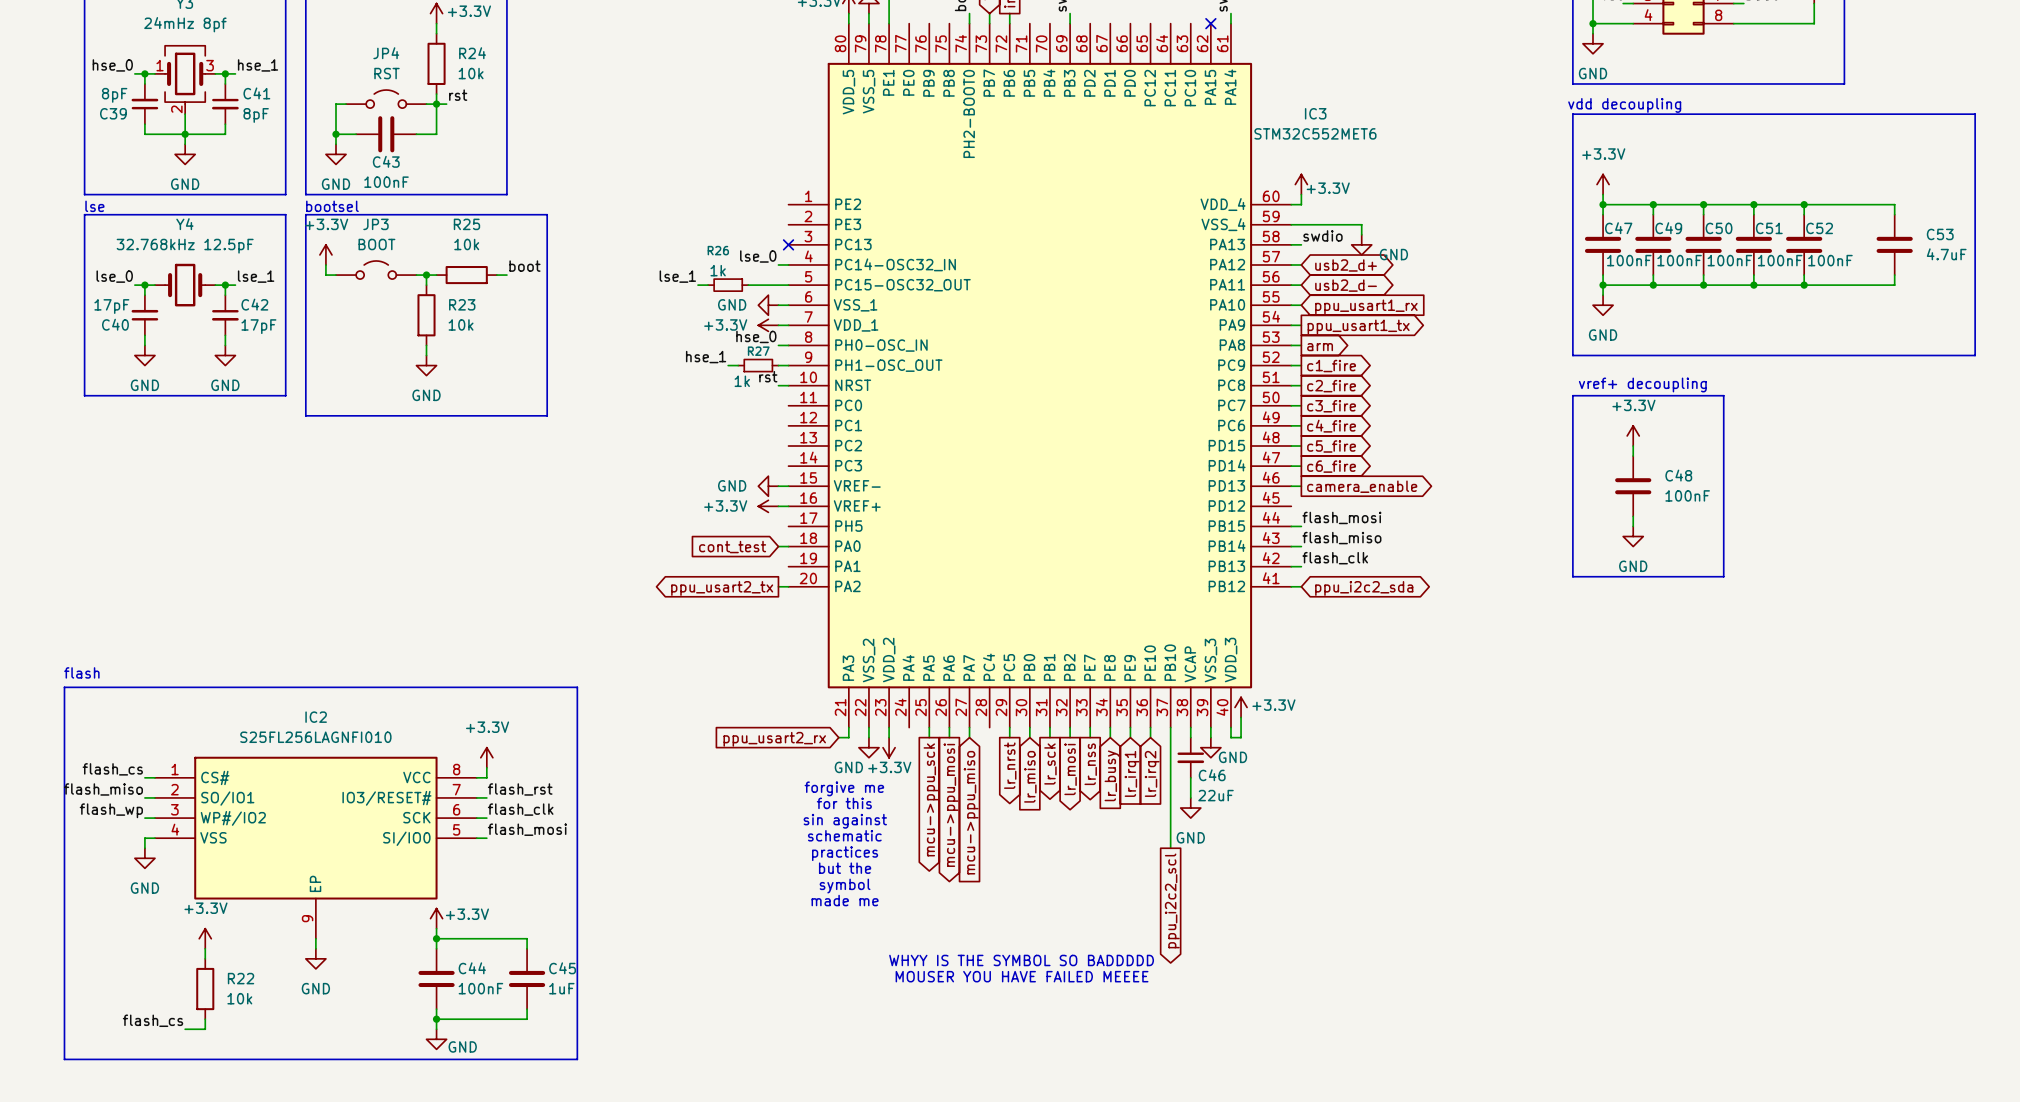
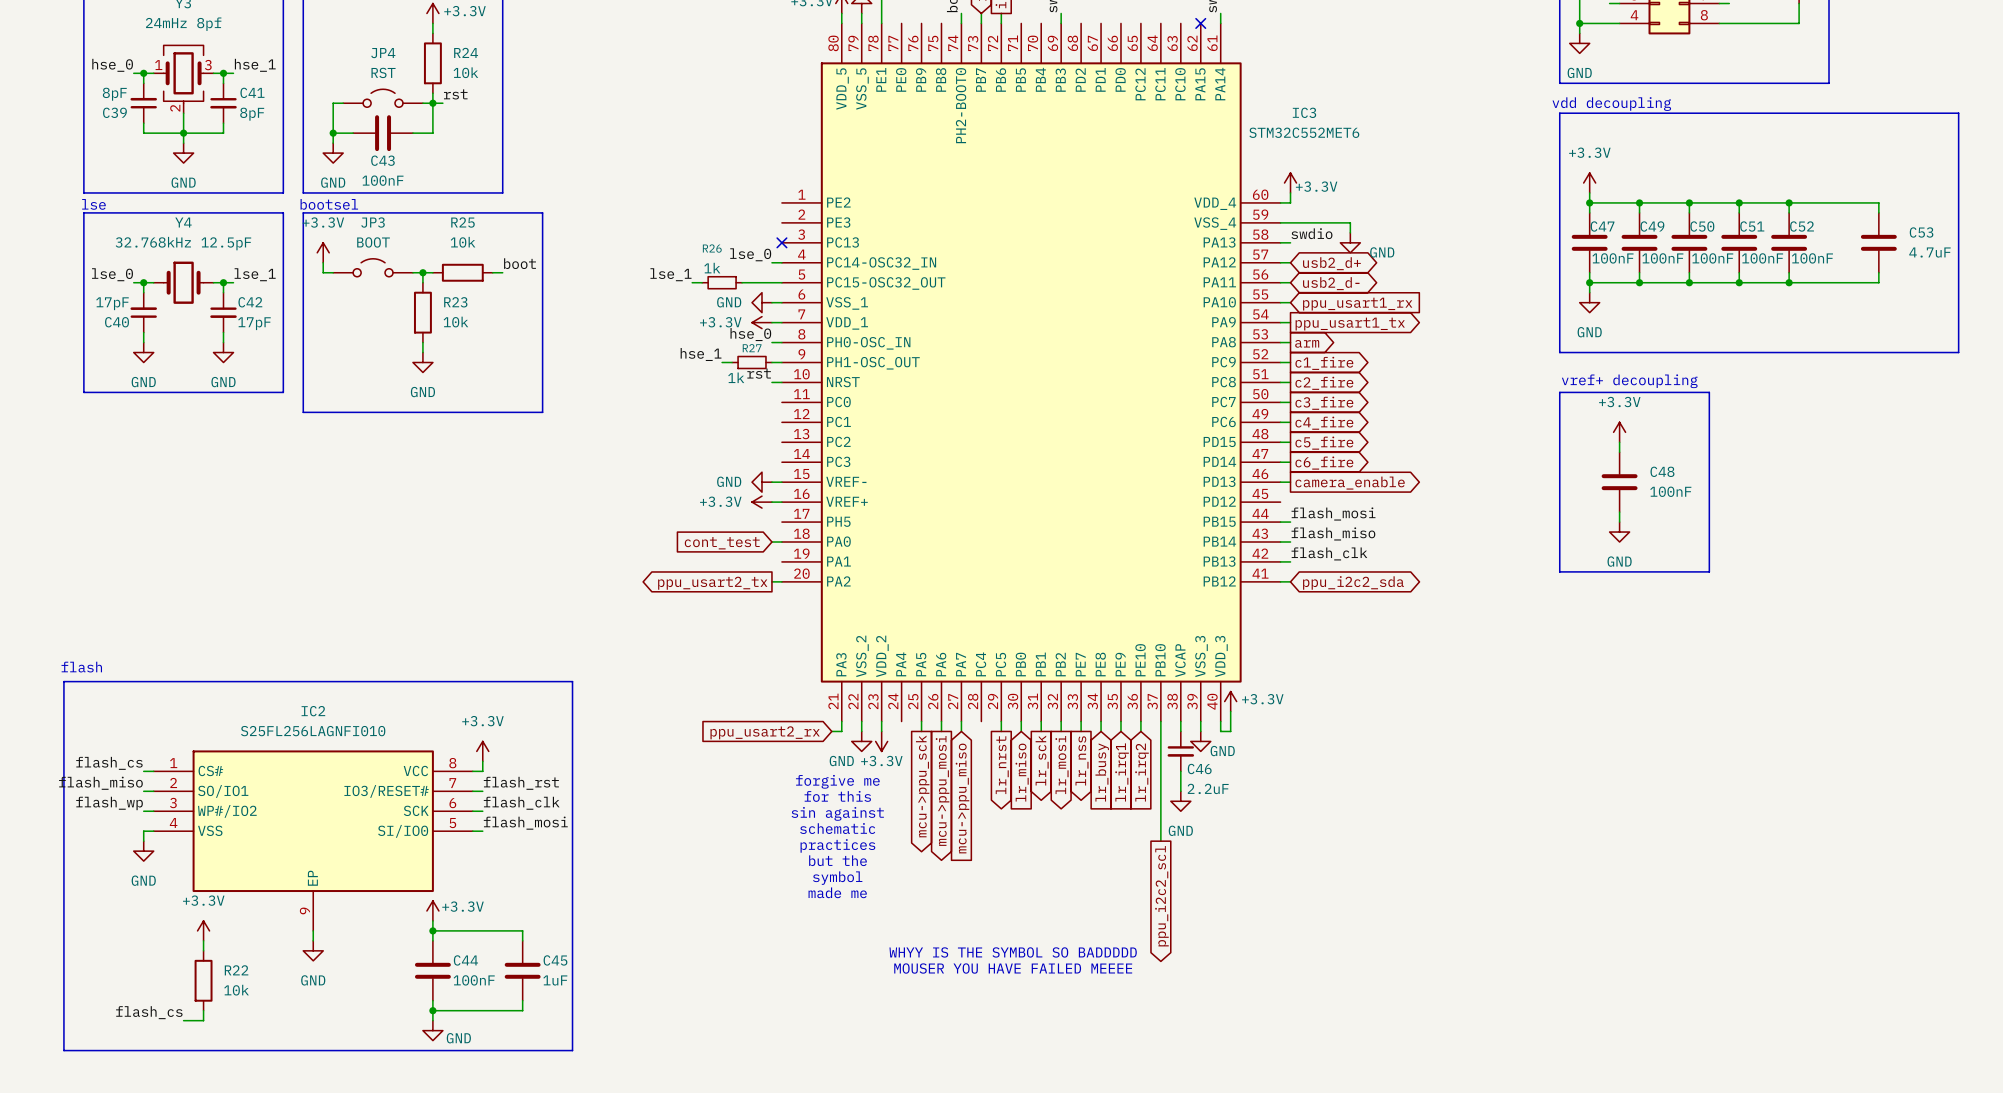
C46 value: 22uF (1216, 795) -> 2.2uF (1208, 788)

